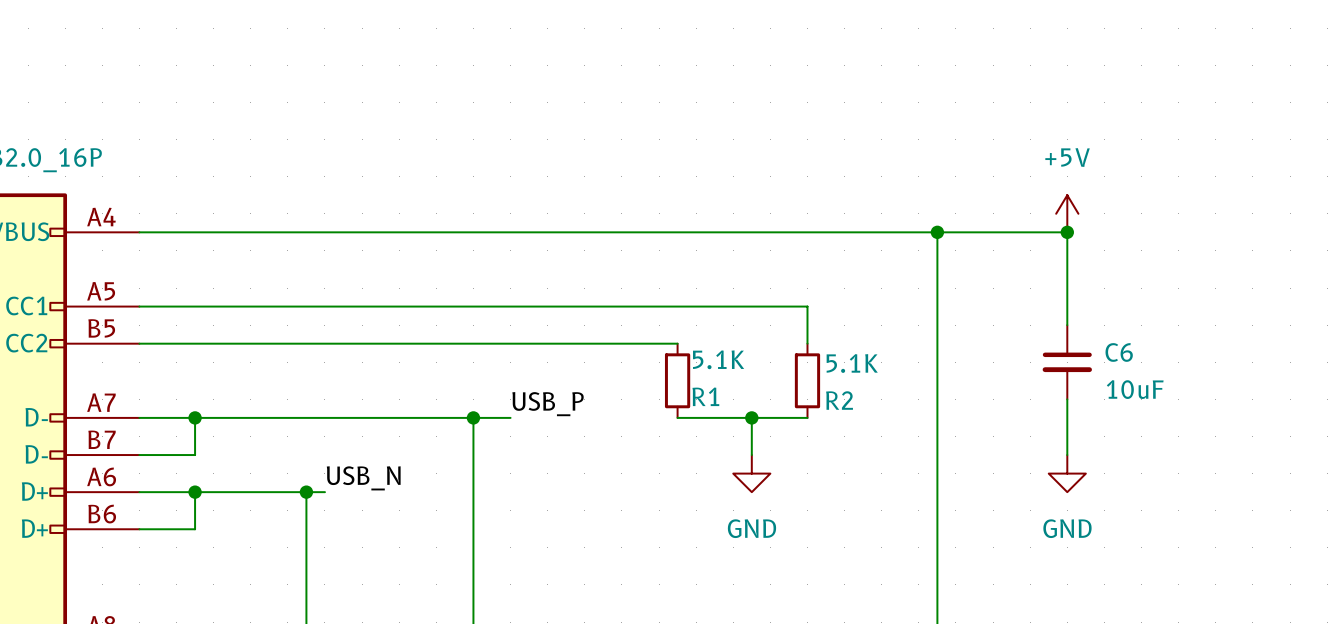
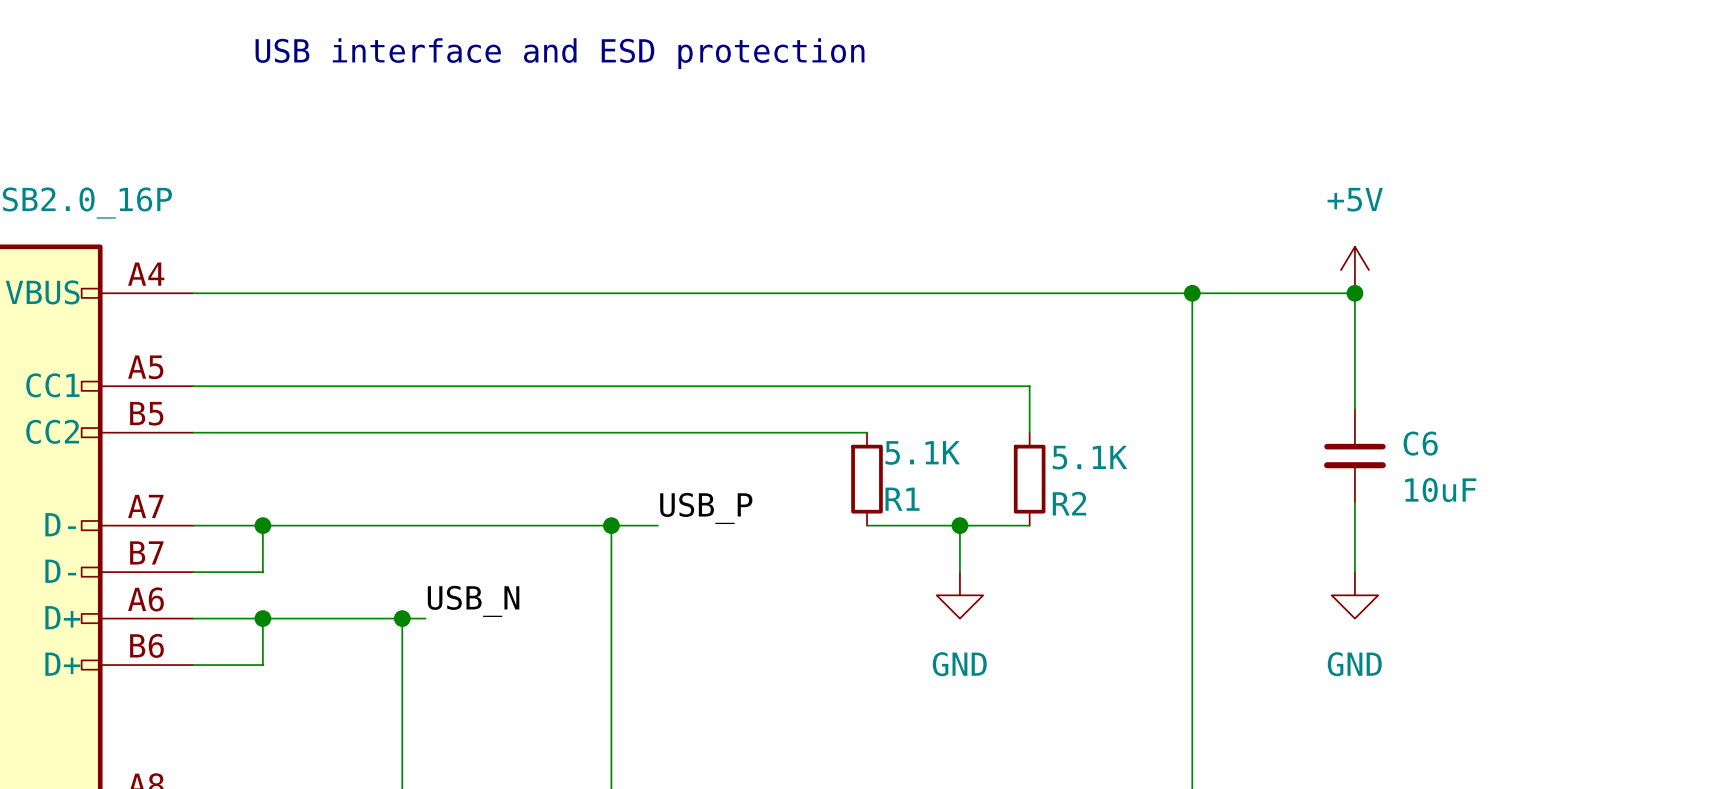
text: none -> USB interface and ESD protection (560, 53)

